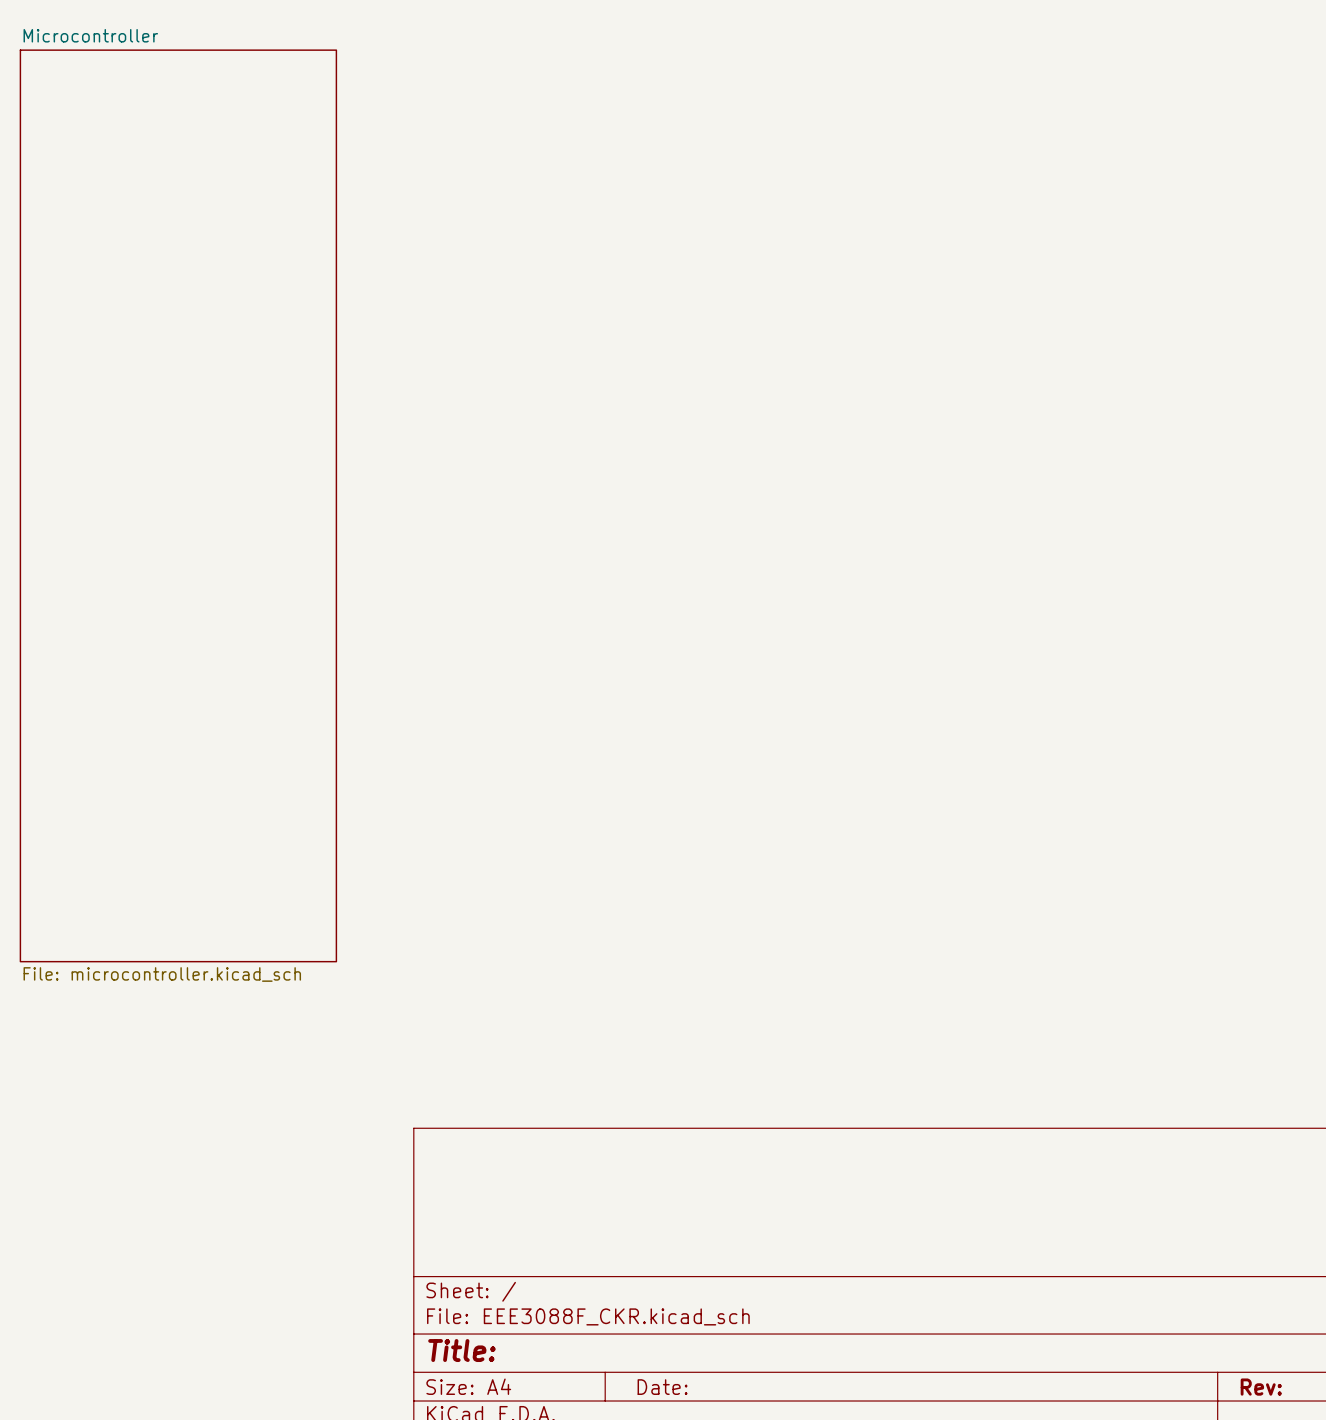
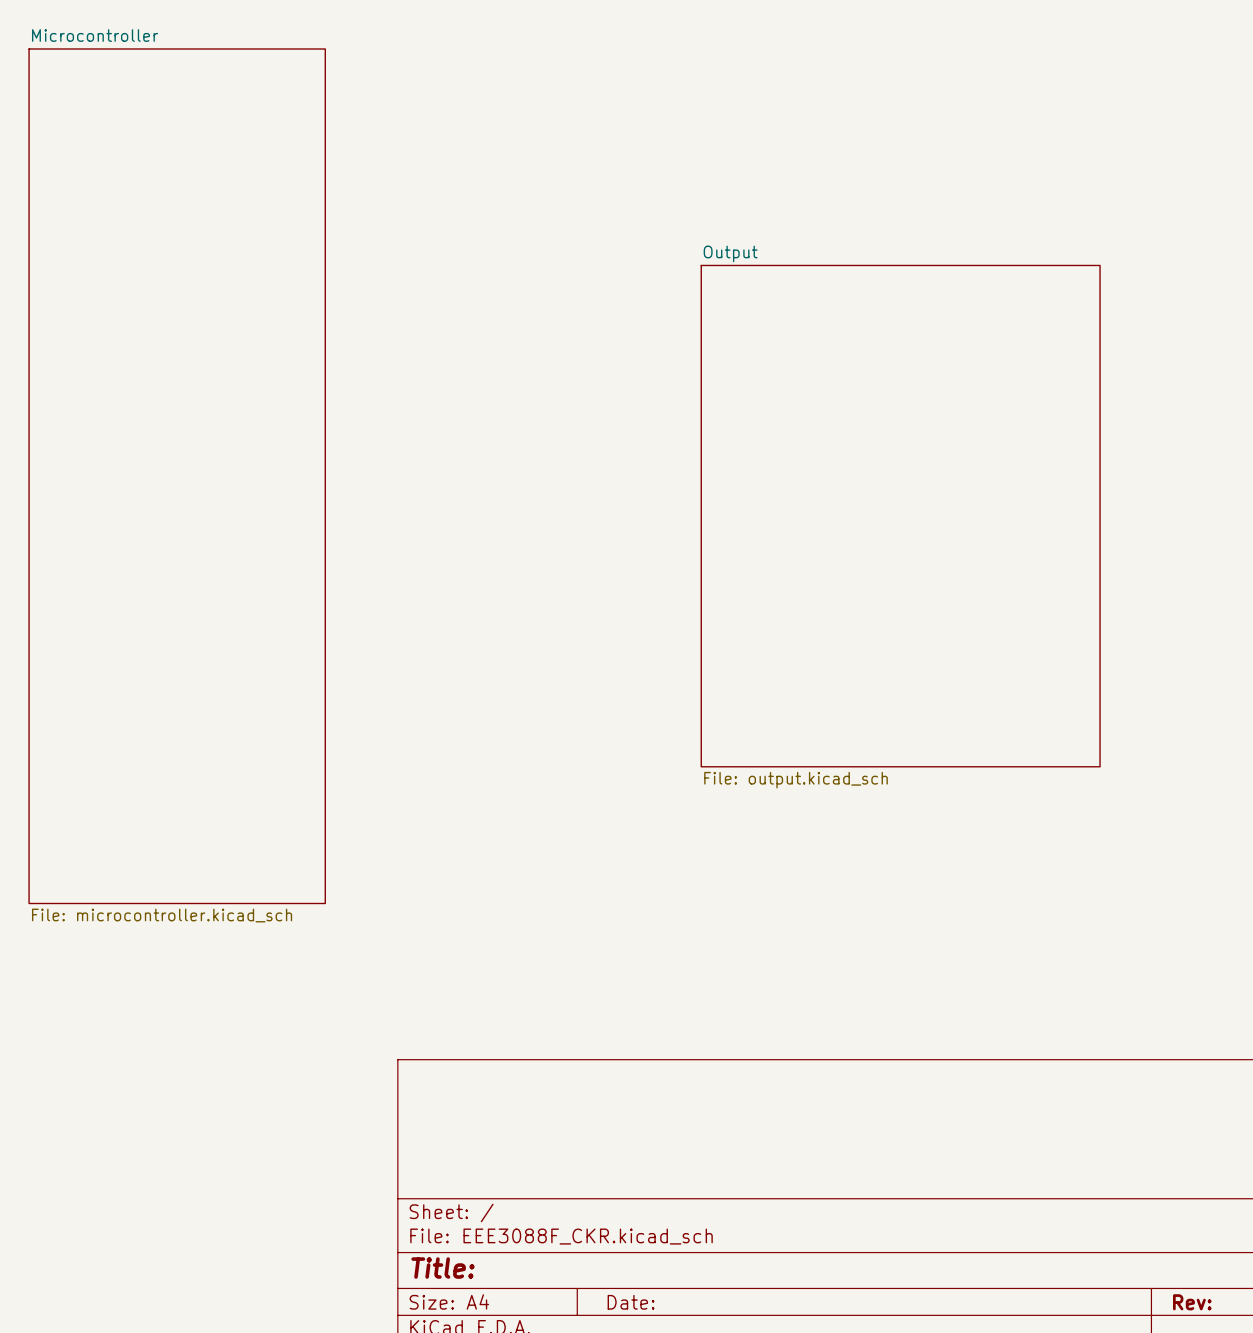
sheet Output: none -> File: output.kicad_sch (900, 516)

